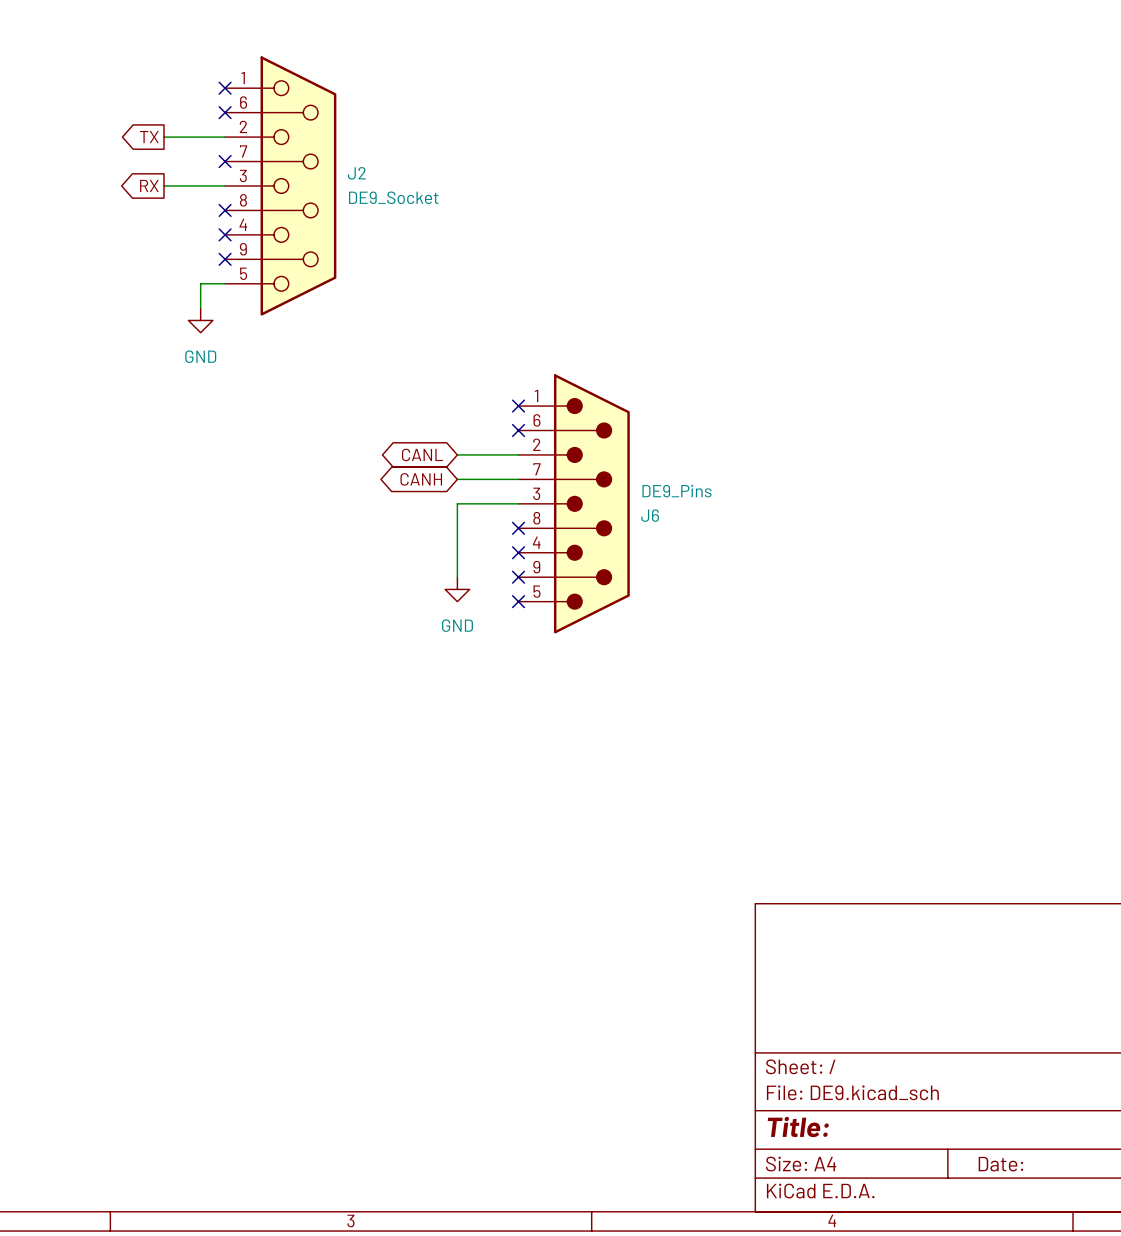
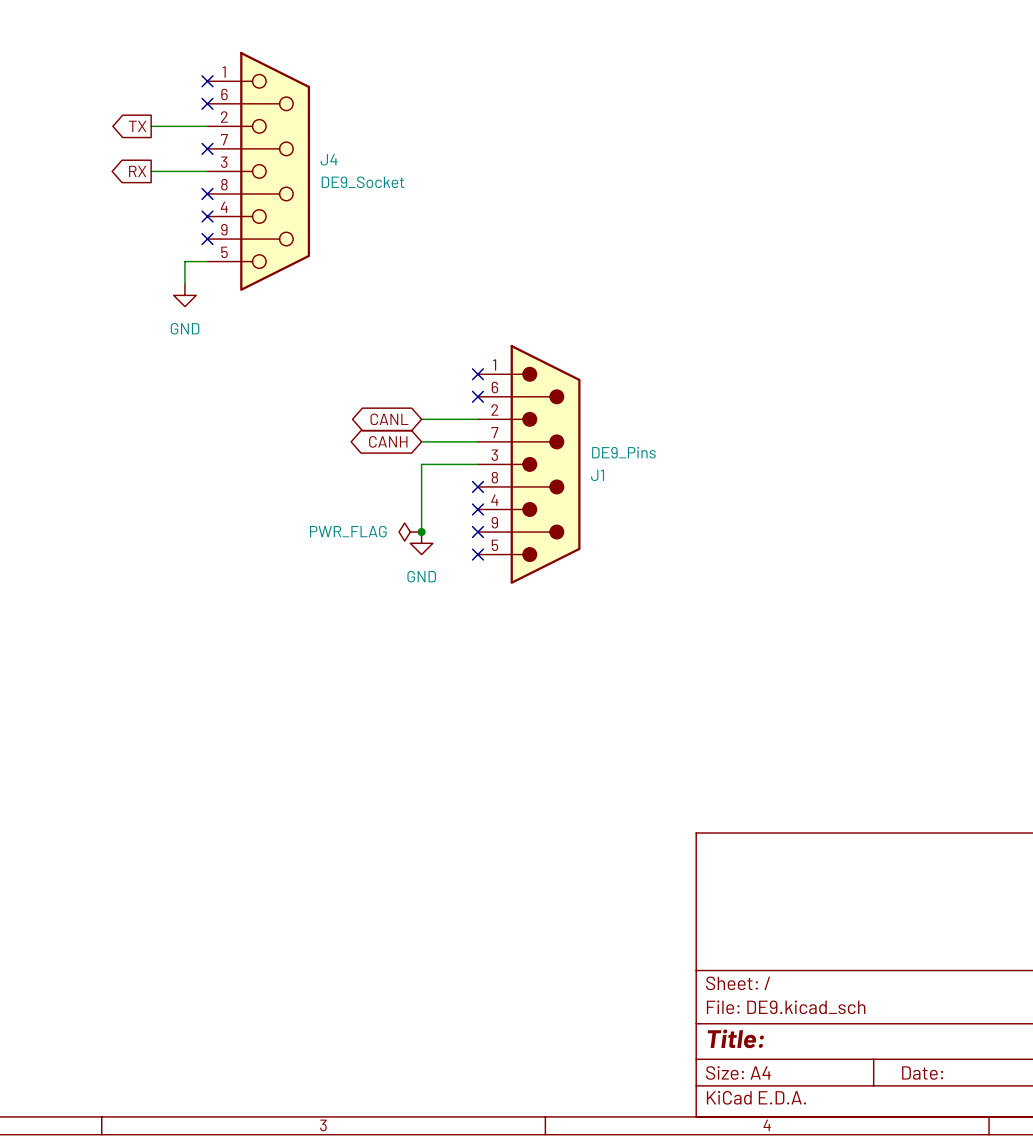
J2 name: J2 (356, 173) -> J4 (329, 159)
J6 name: J6 (650, 515) -> J1 (597, 475)
power symbol: none -> PWR_FLAG (410, 532)
junction: none -> (421, 532)

